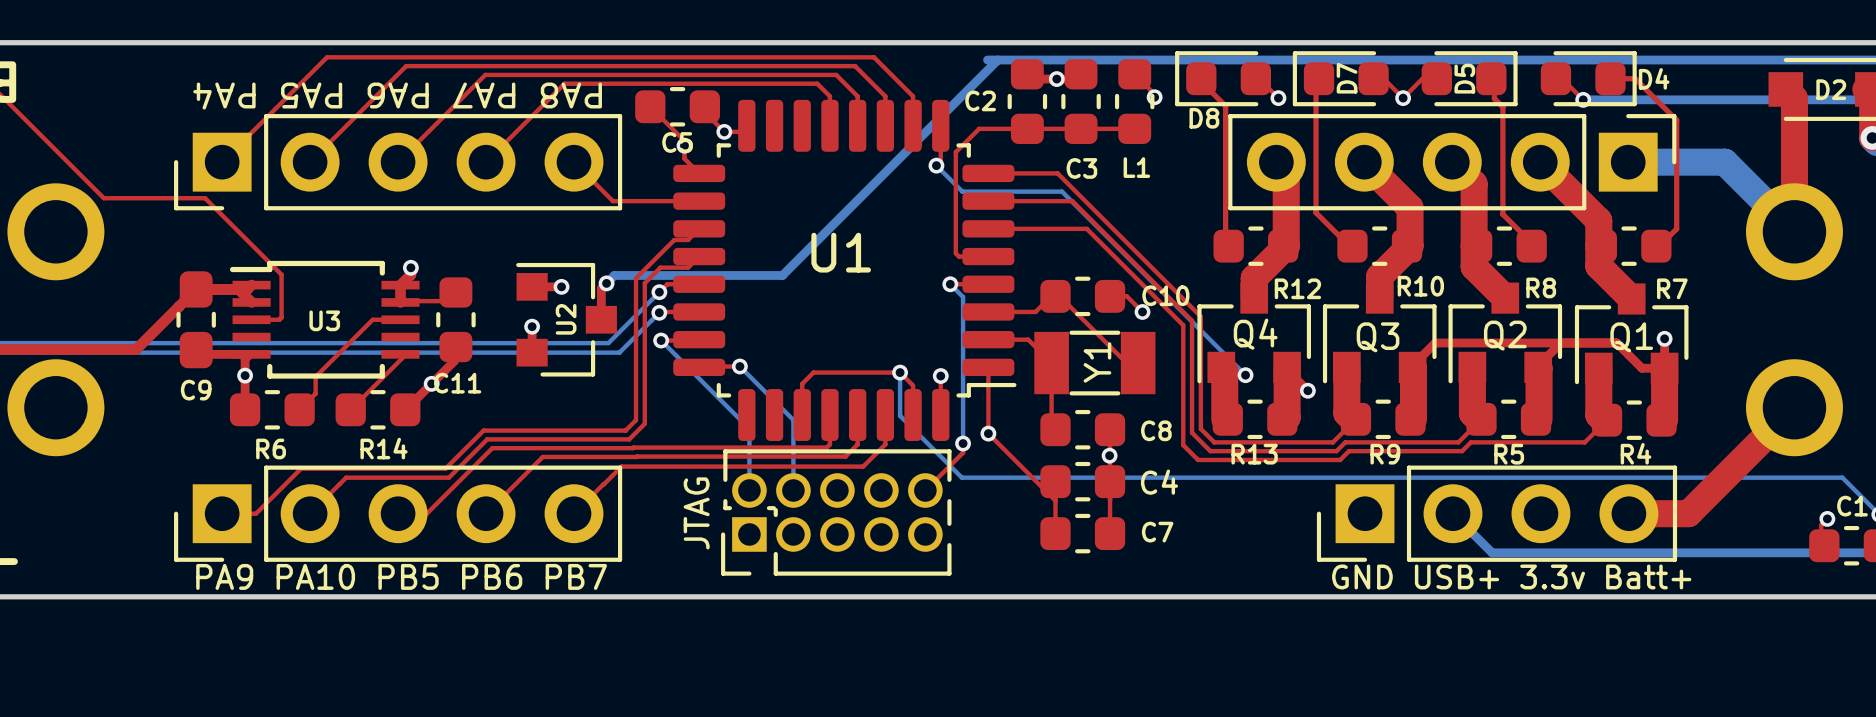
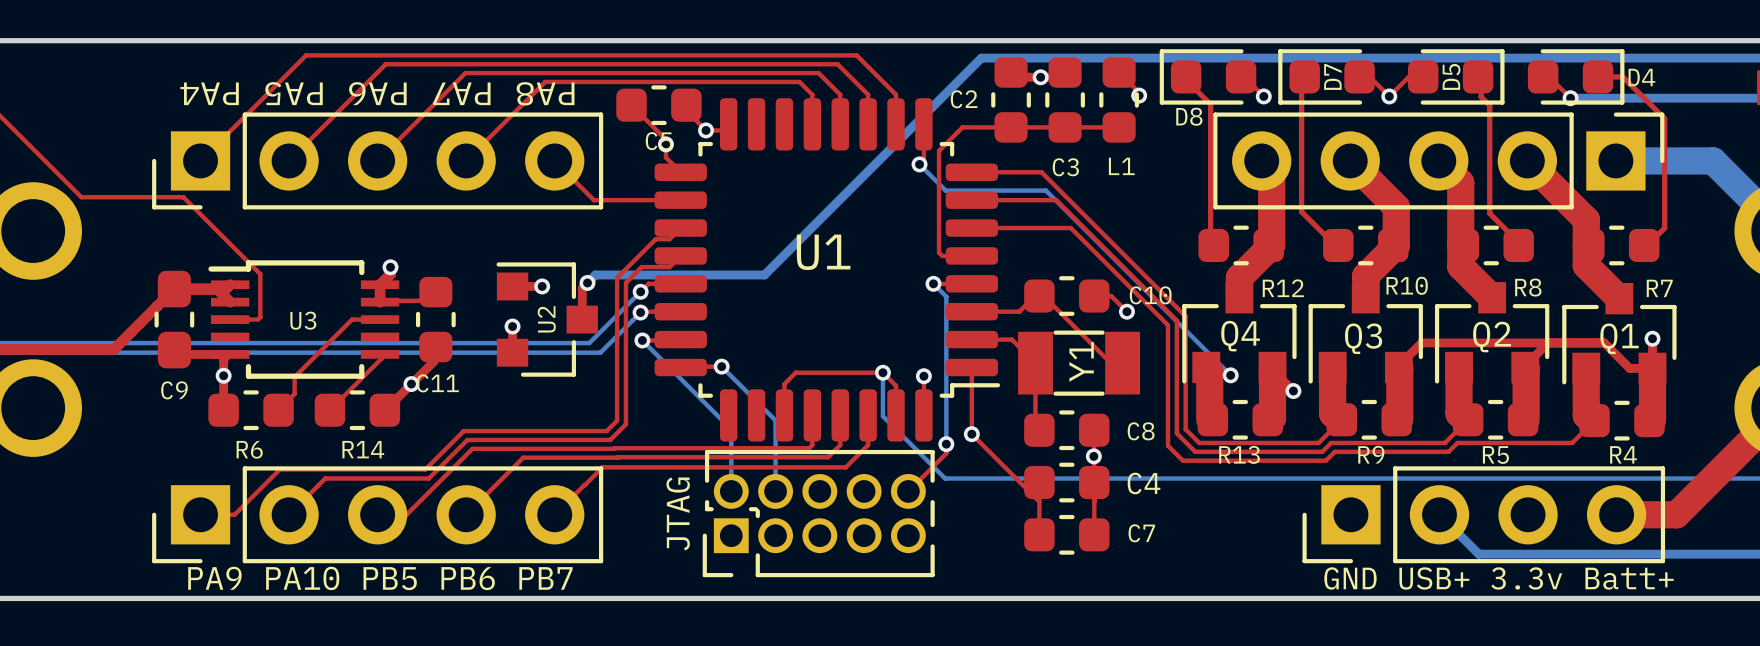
bottom track: (987, 60) (997, 60) -> none

